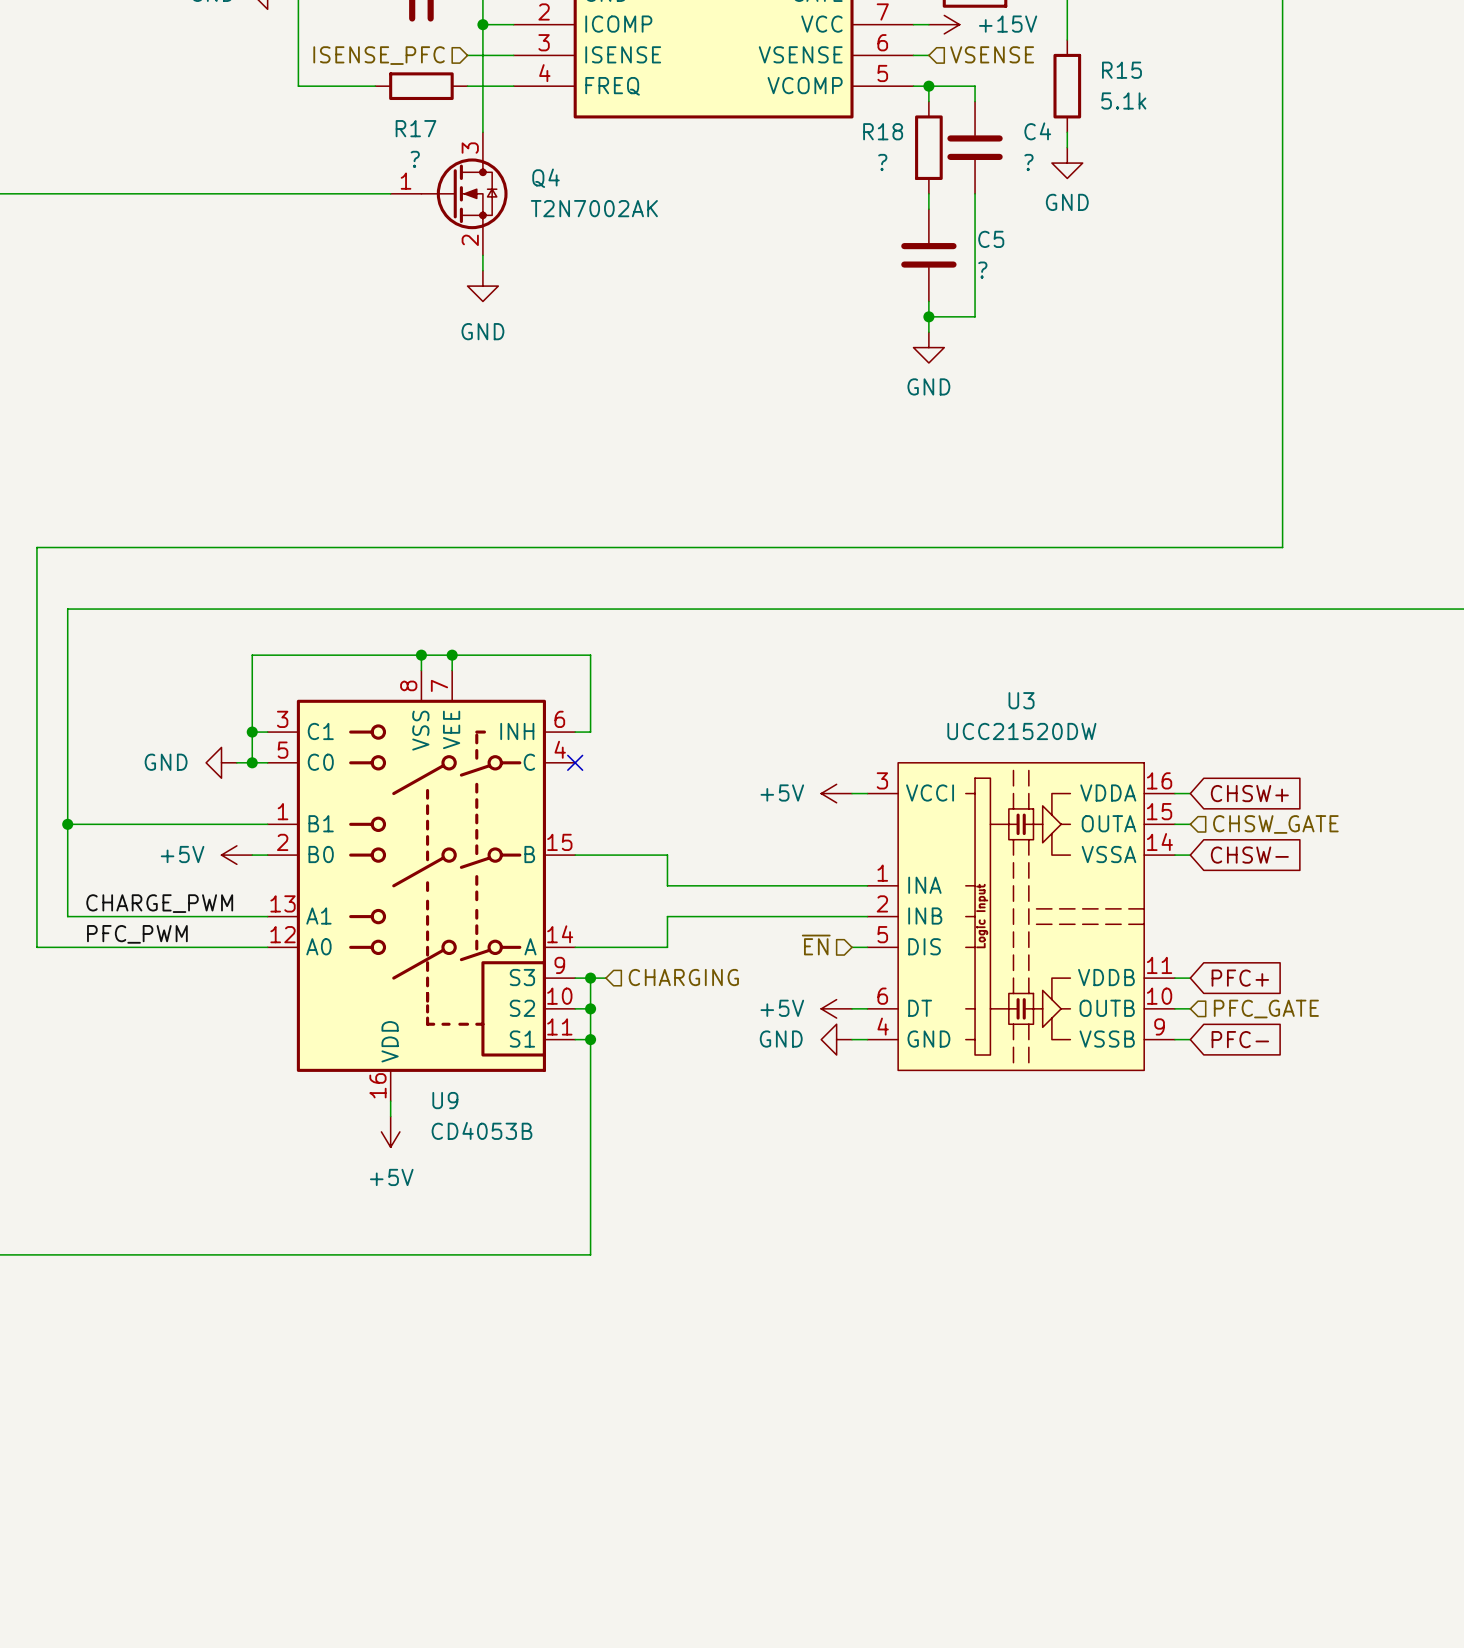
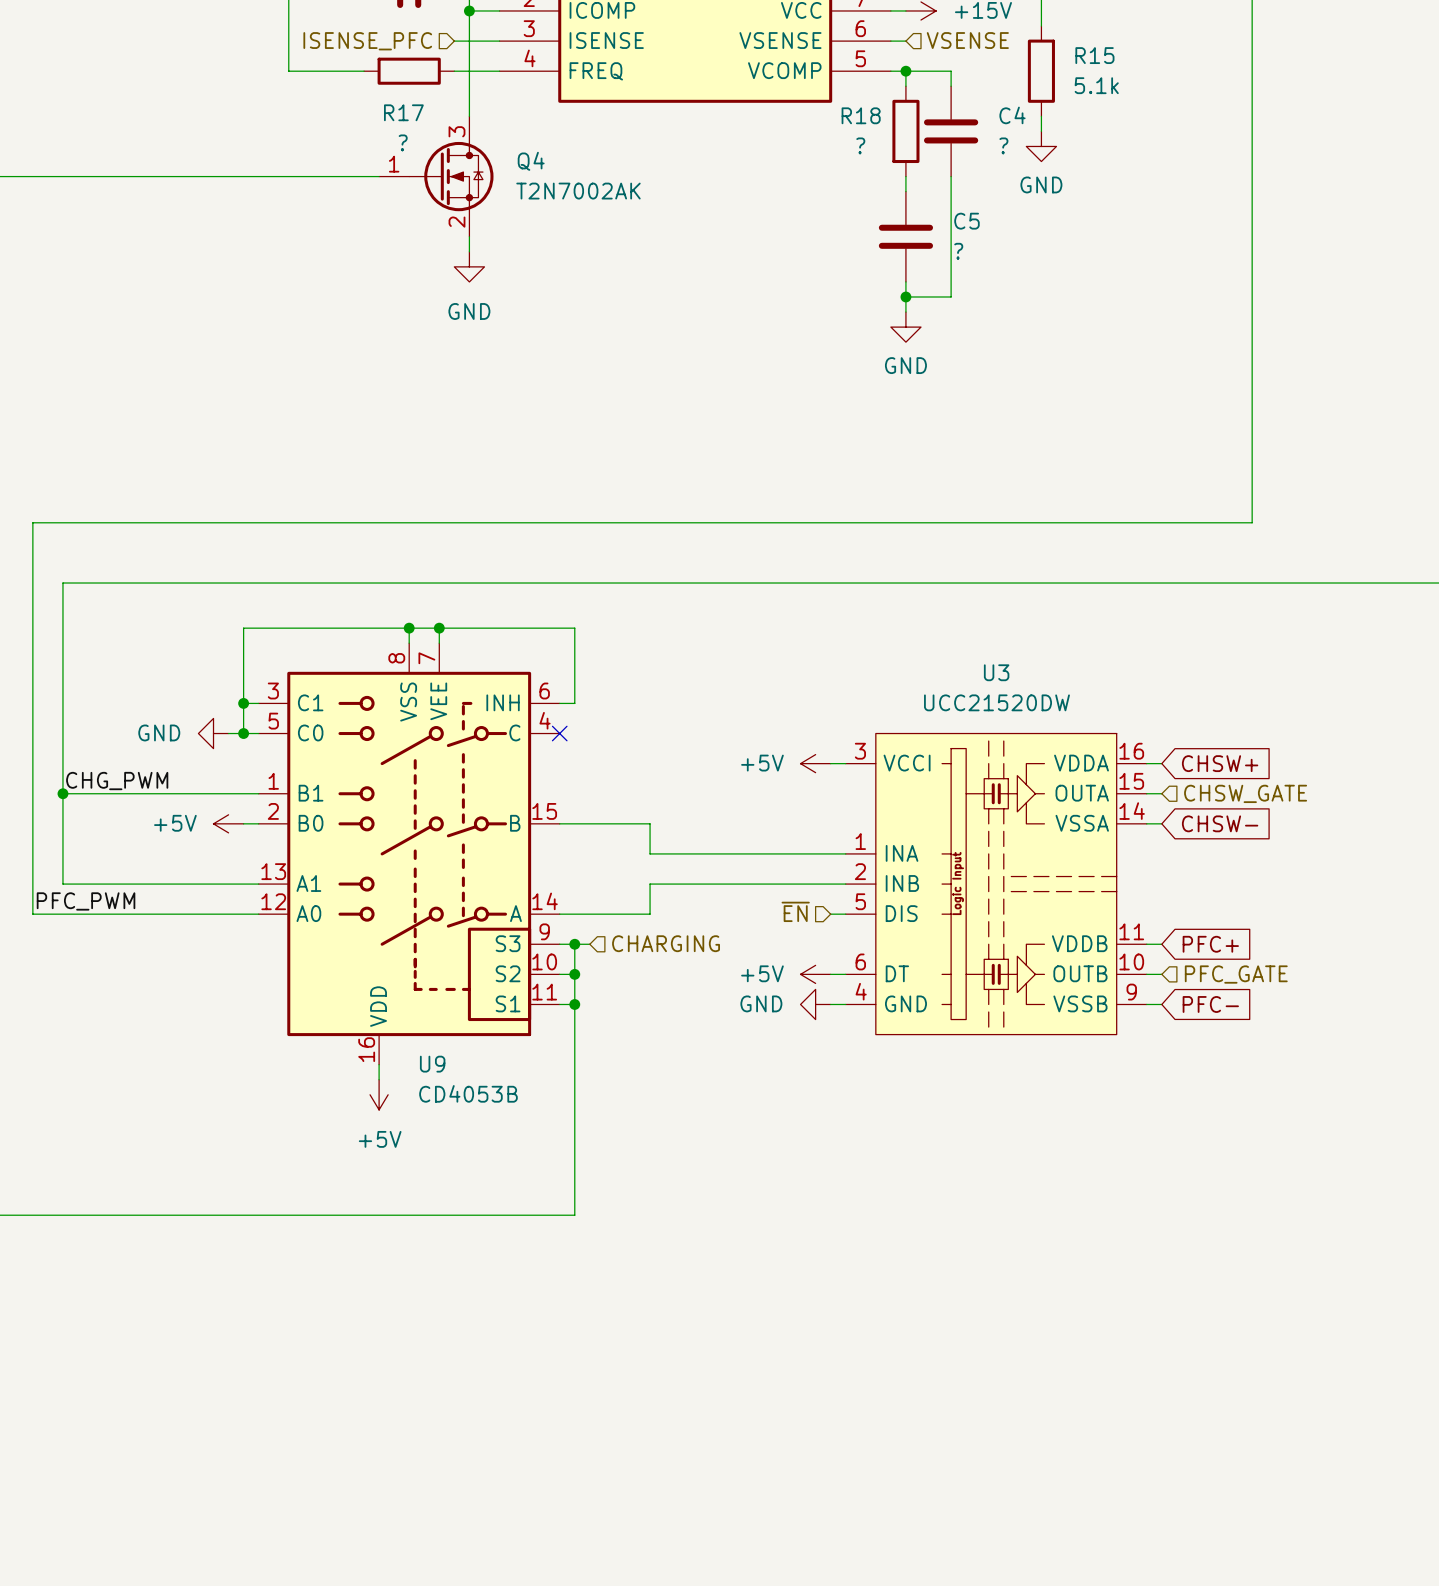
label: none -> CHG_PWM (117, 781)
label: CHARGE_PWM (159, 903) -> none
label position: PFC_PWM (137, 934) -> PFC_PWM (86, 901)

